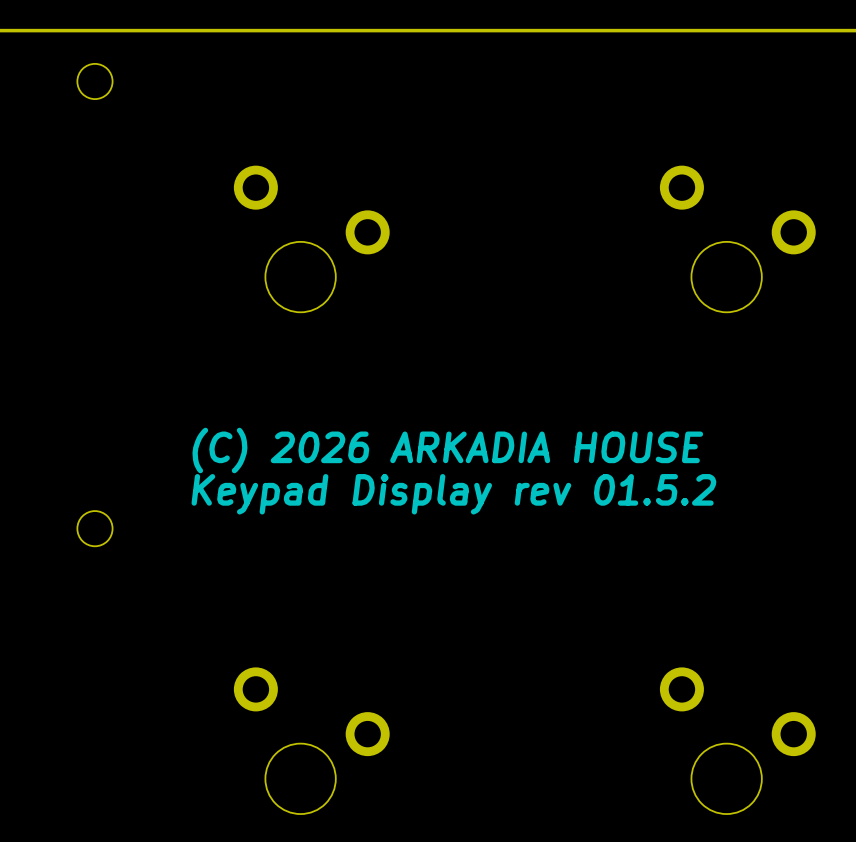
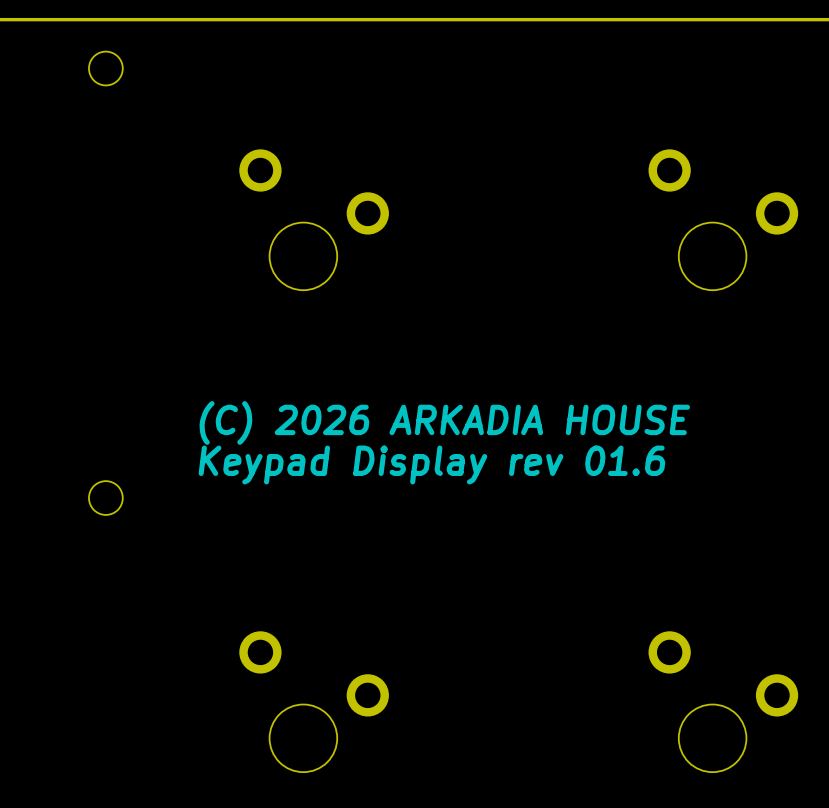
text: Keypad Display rev 01.5.2 (453, 494) -> Keypad Display rev 01.6 (431, 465)

